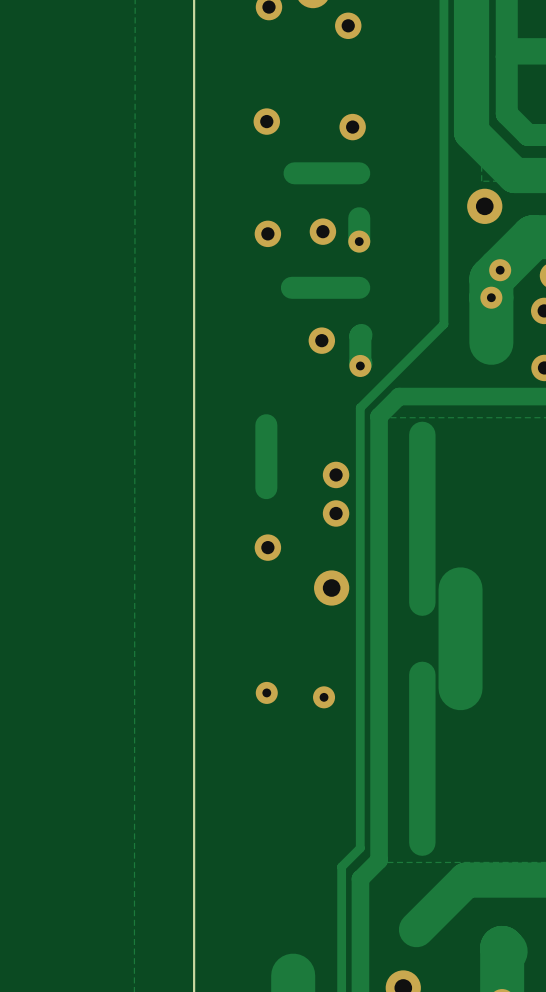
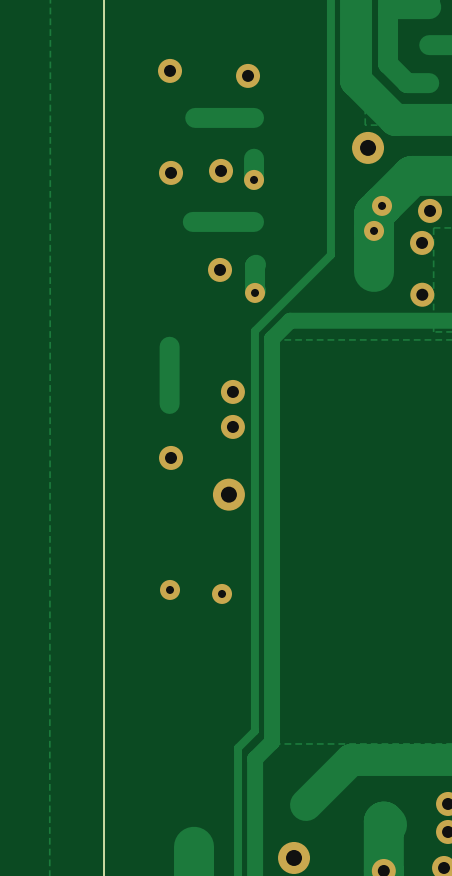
track: (422, 434) (422, 602) -> none
track: (460, 589) (460, 688) -> none
track: (422, 674) (422, 842) -> none

